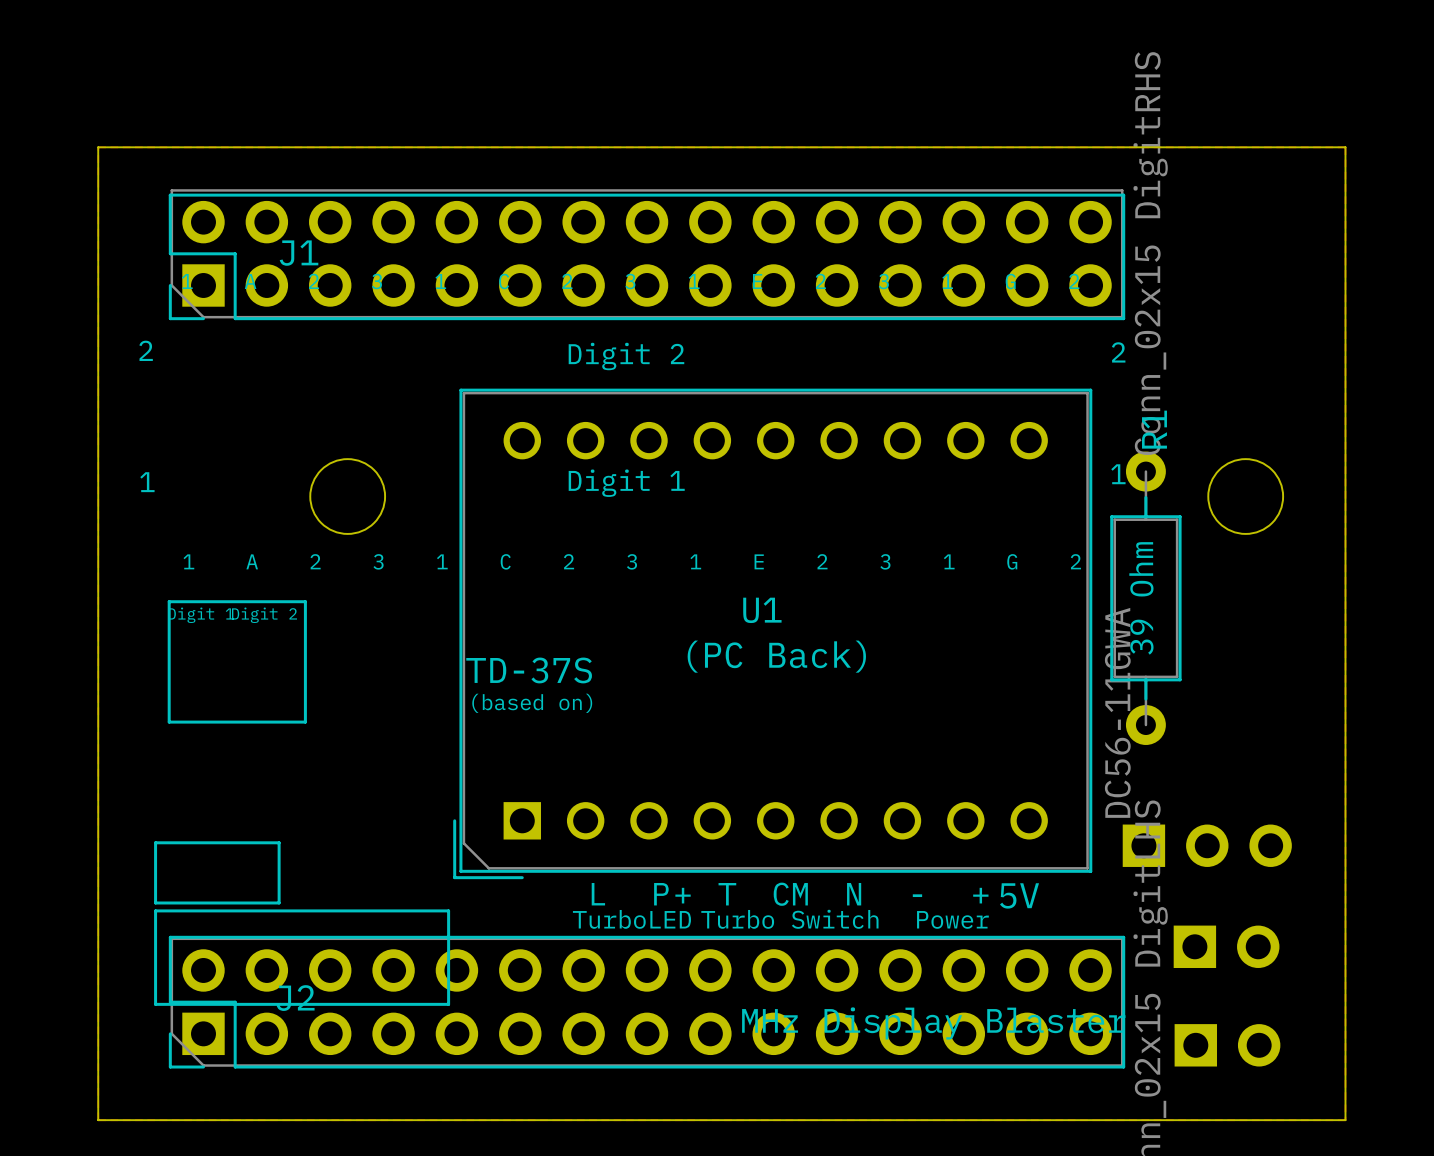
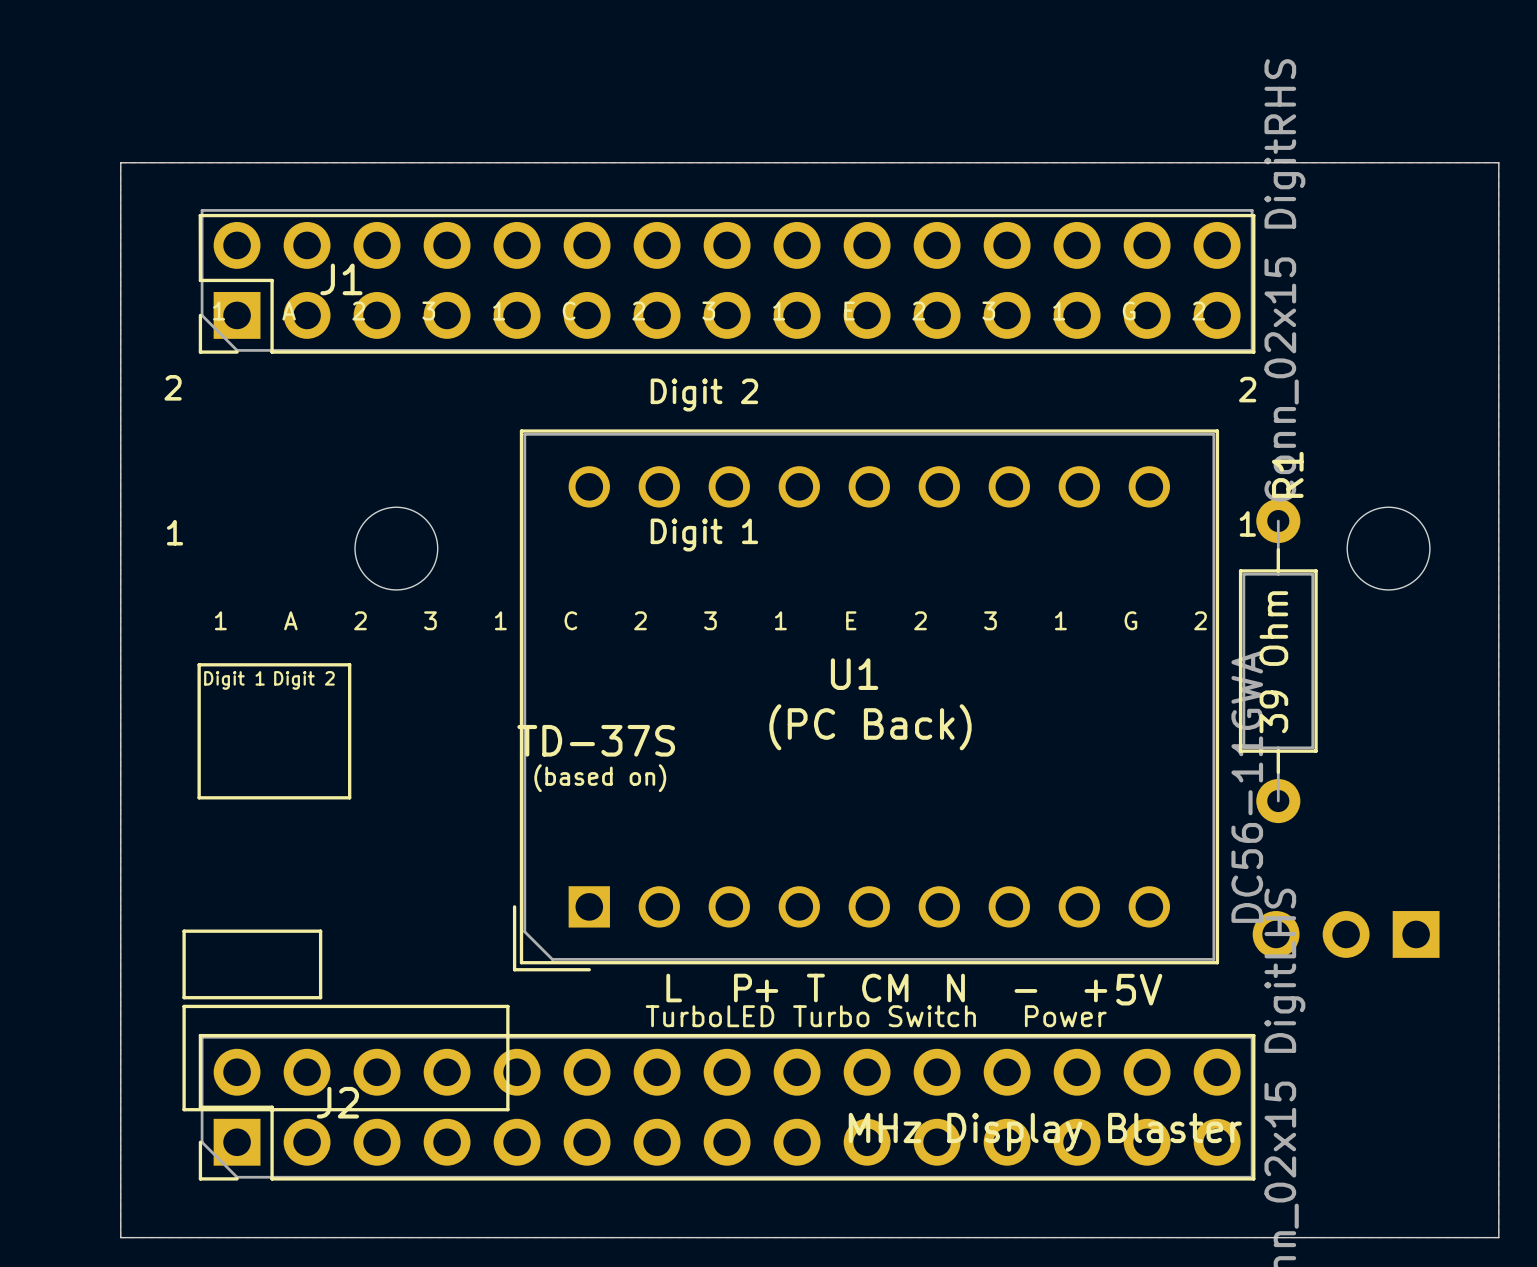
part rotation: 0° (1207, 845) -> 180° (1346, 934)
part: (1226, 946) -> none
part: (1227, 1045) -> none

